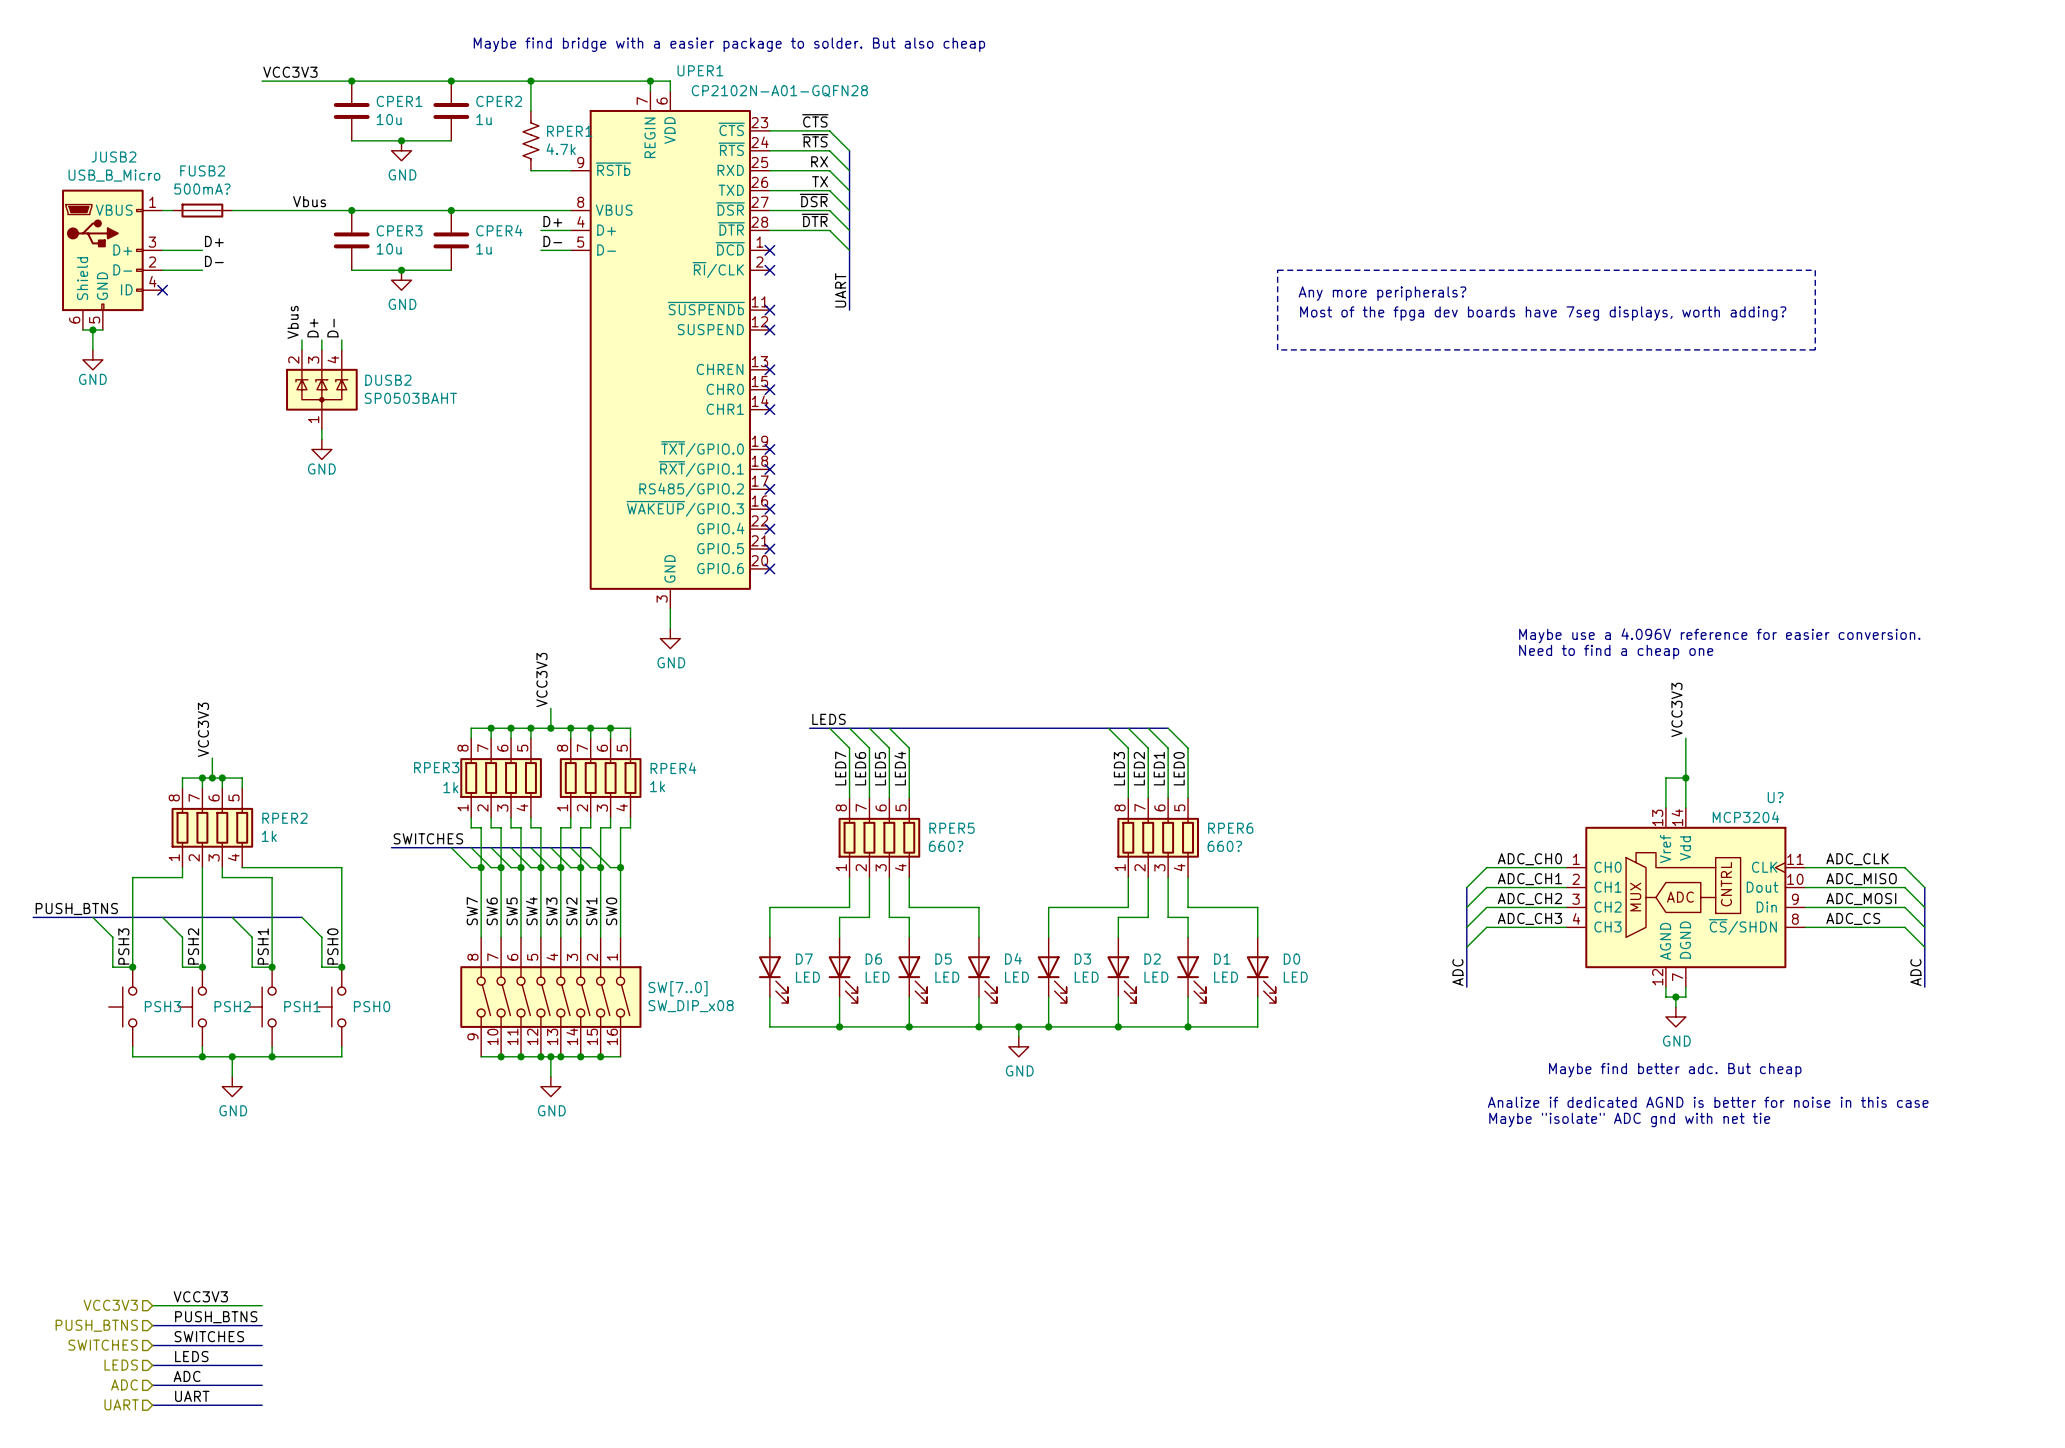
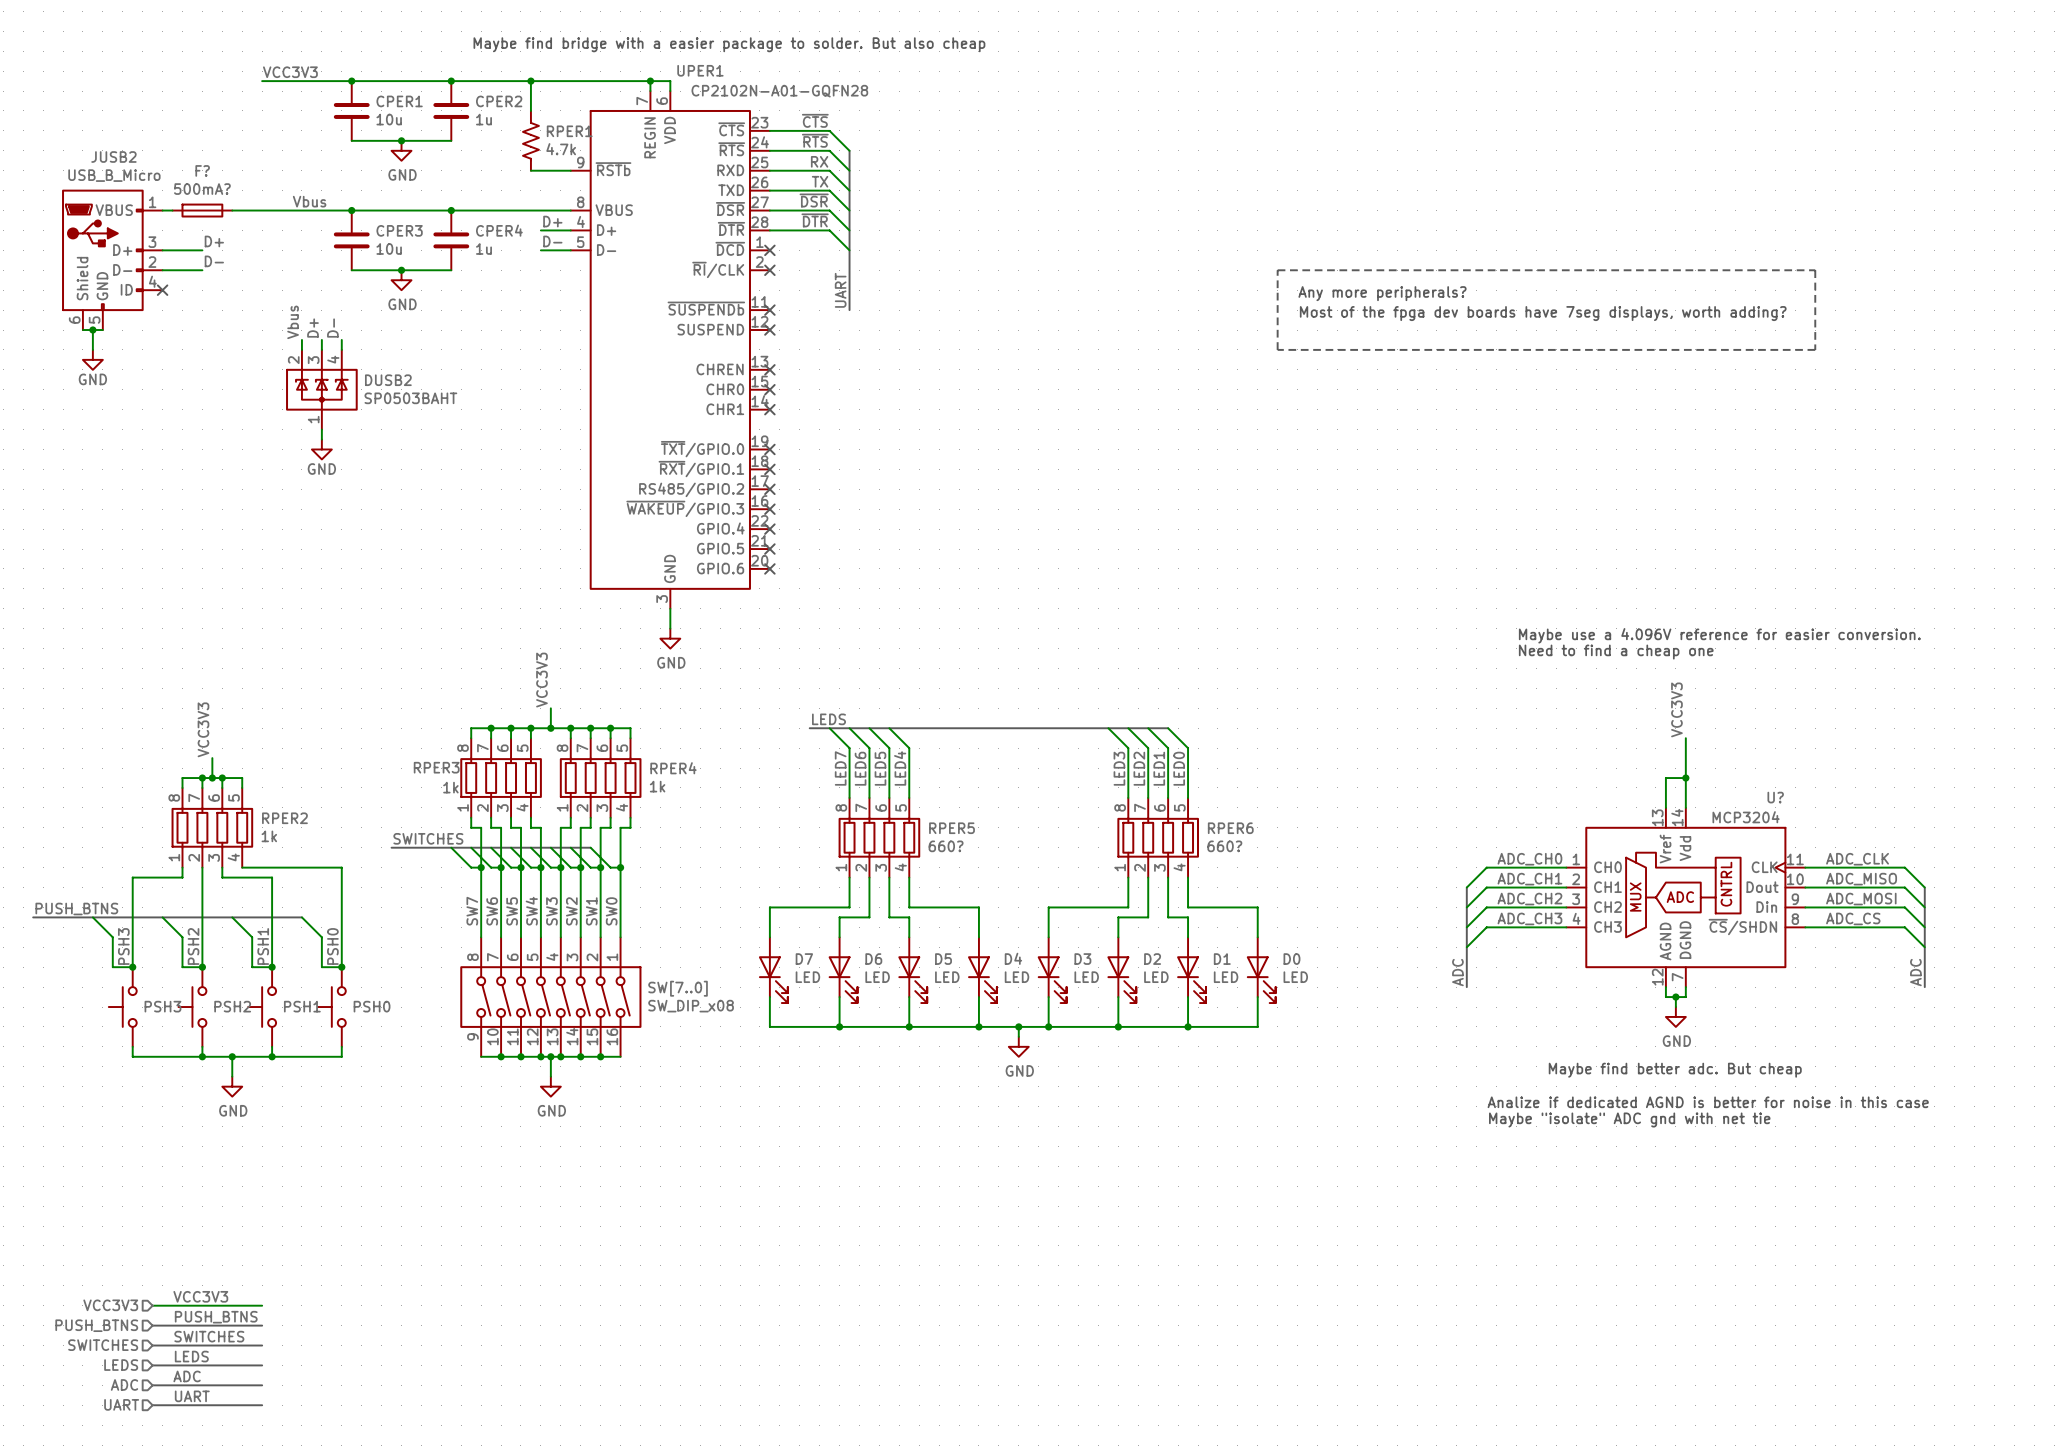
FUSB2 name: FUSB2 (202, 170) -> F? (202, 170)

